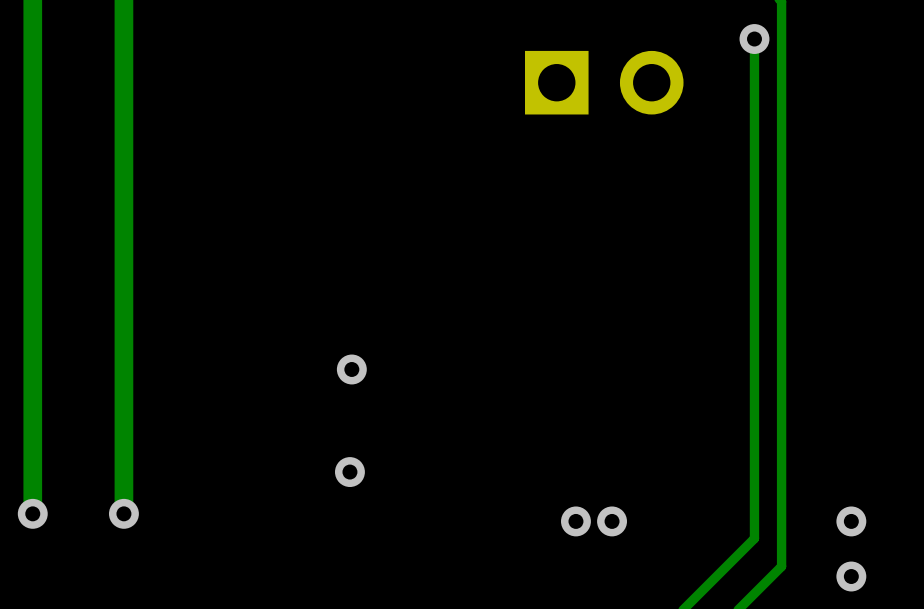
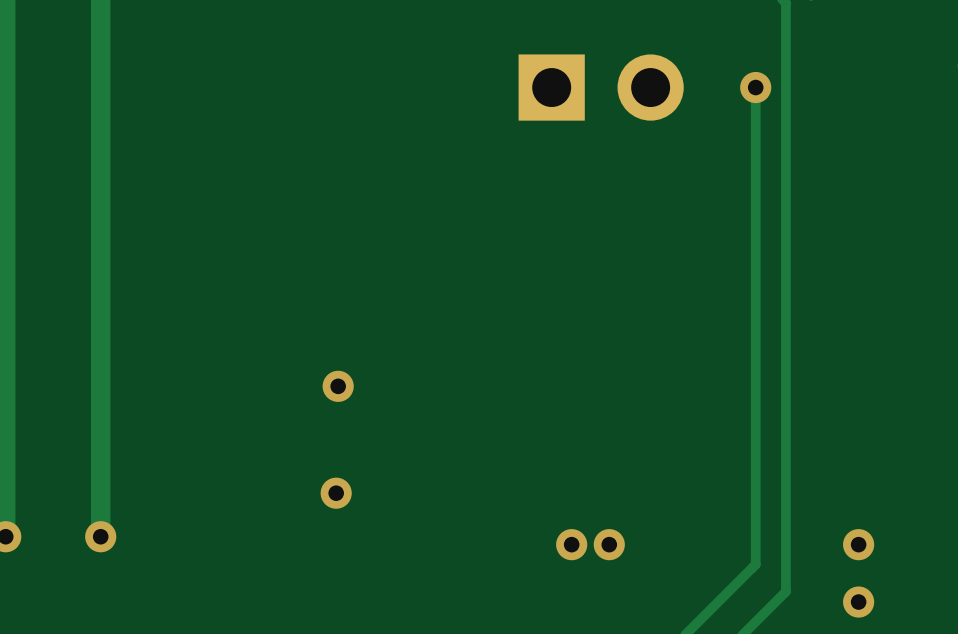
track: (754, 39) (754, 538) (752, 540) -> (755, 87) (755, 564)
via position: (754, 39) -> (755, 87)

